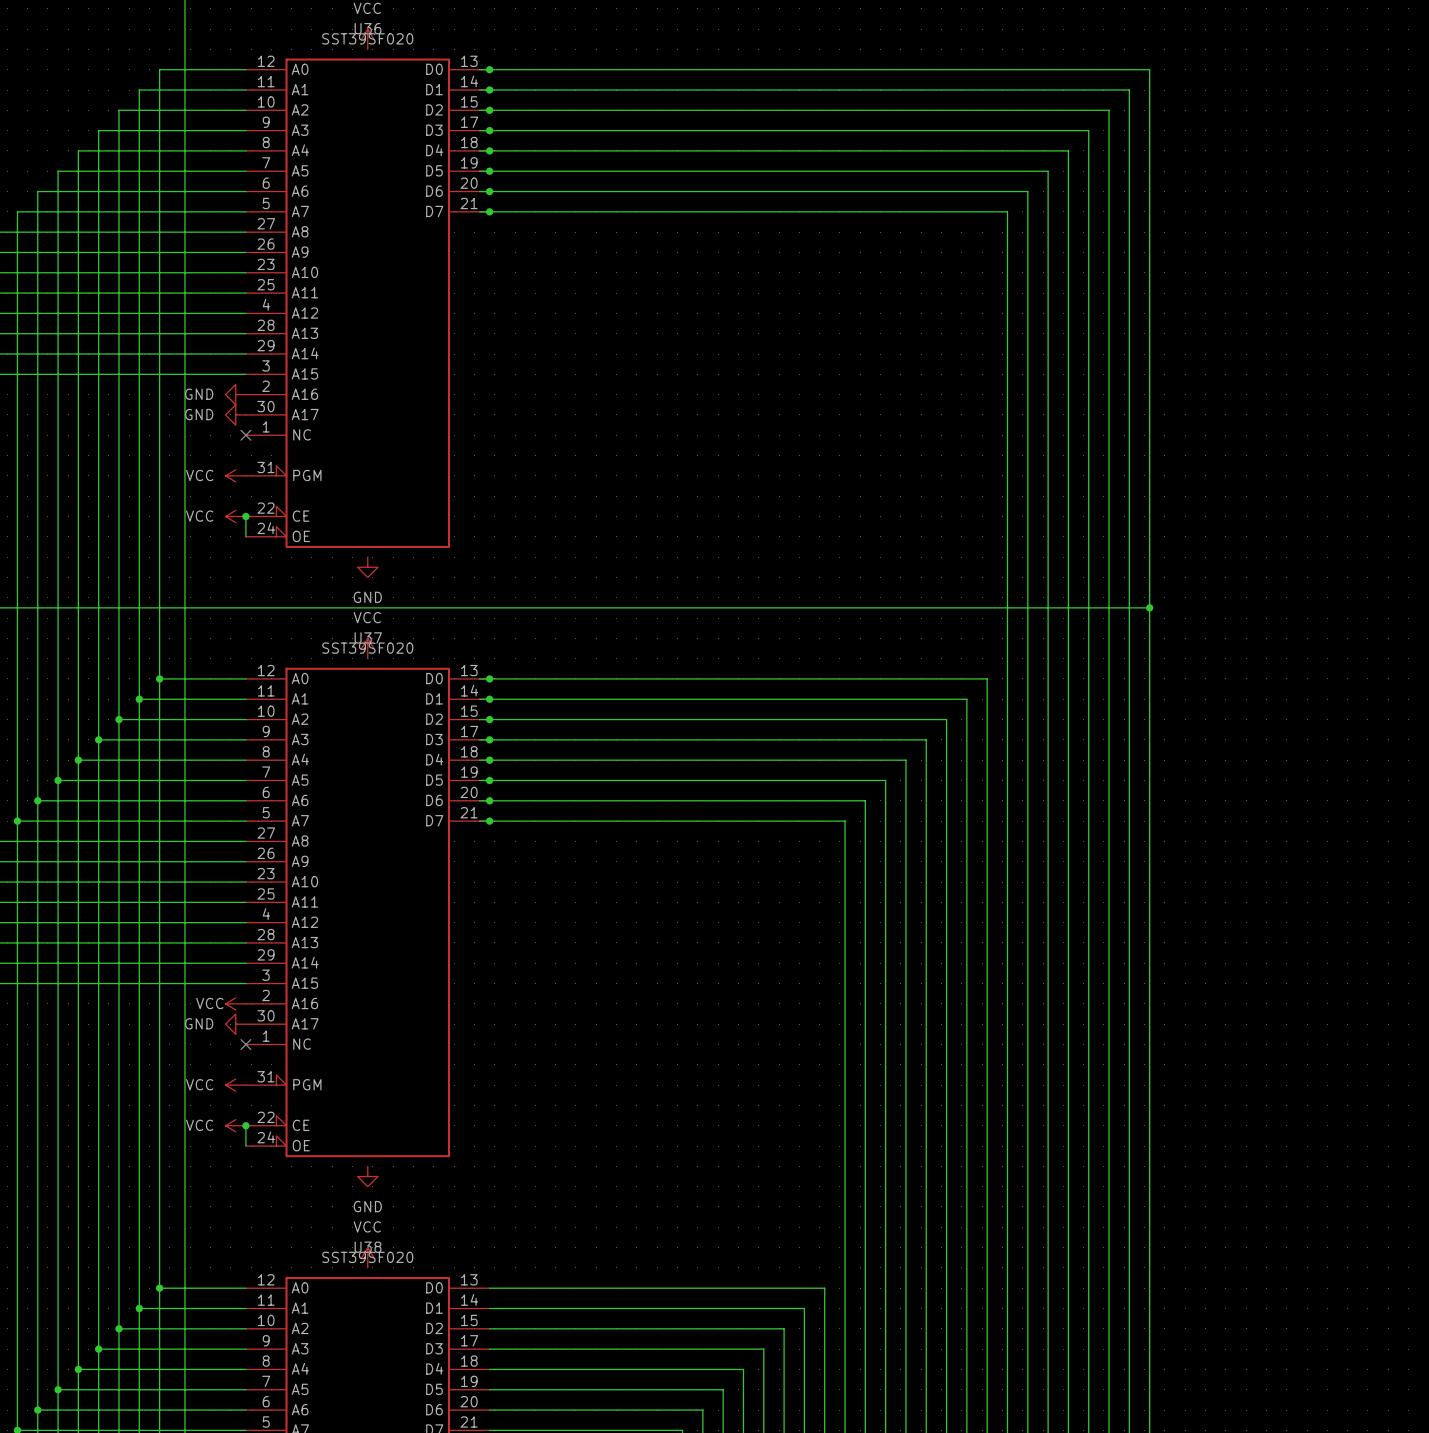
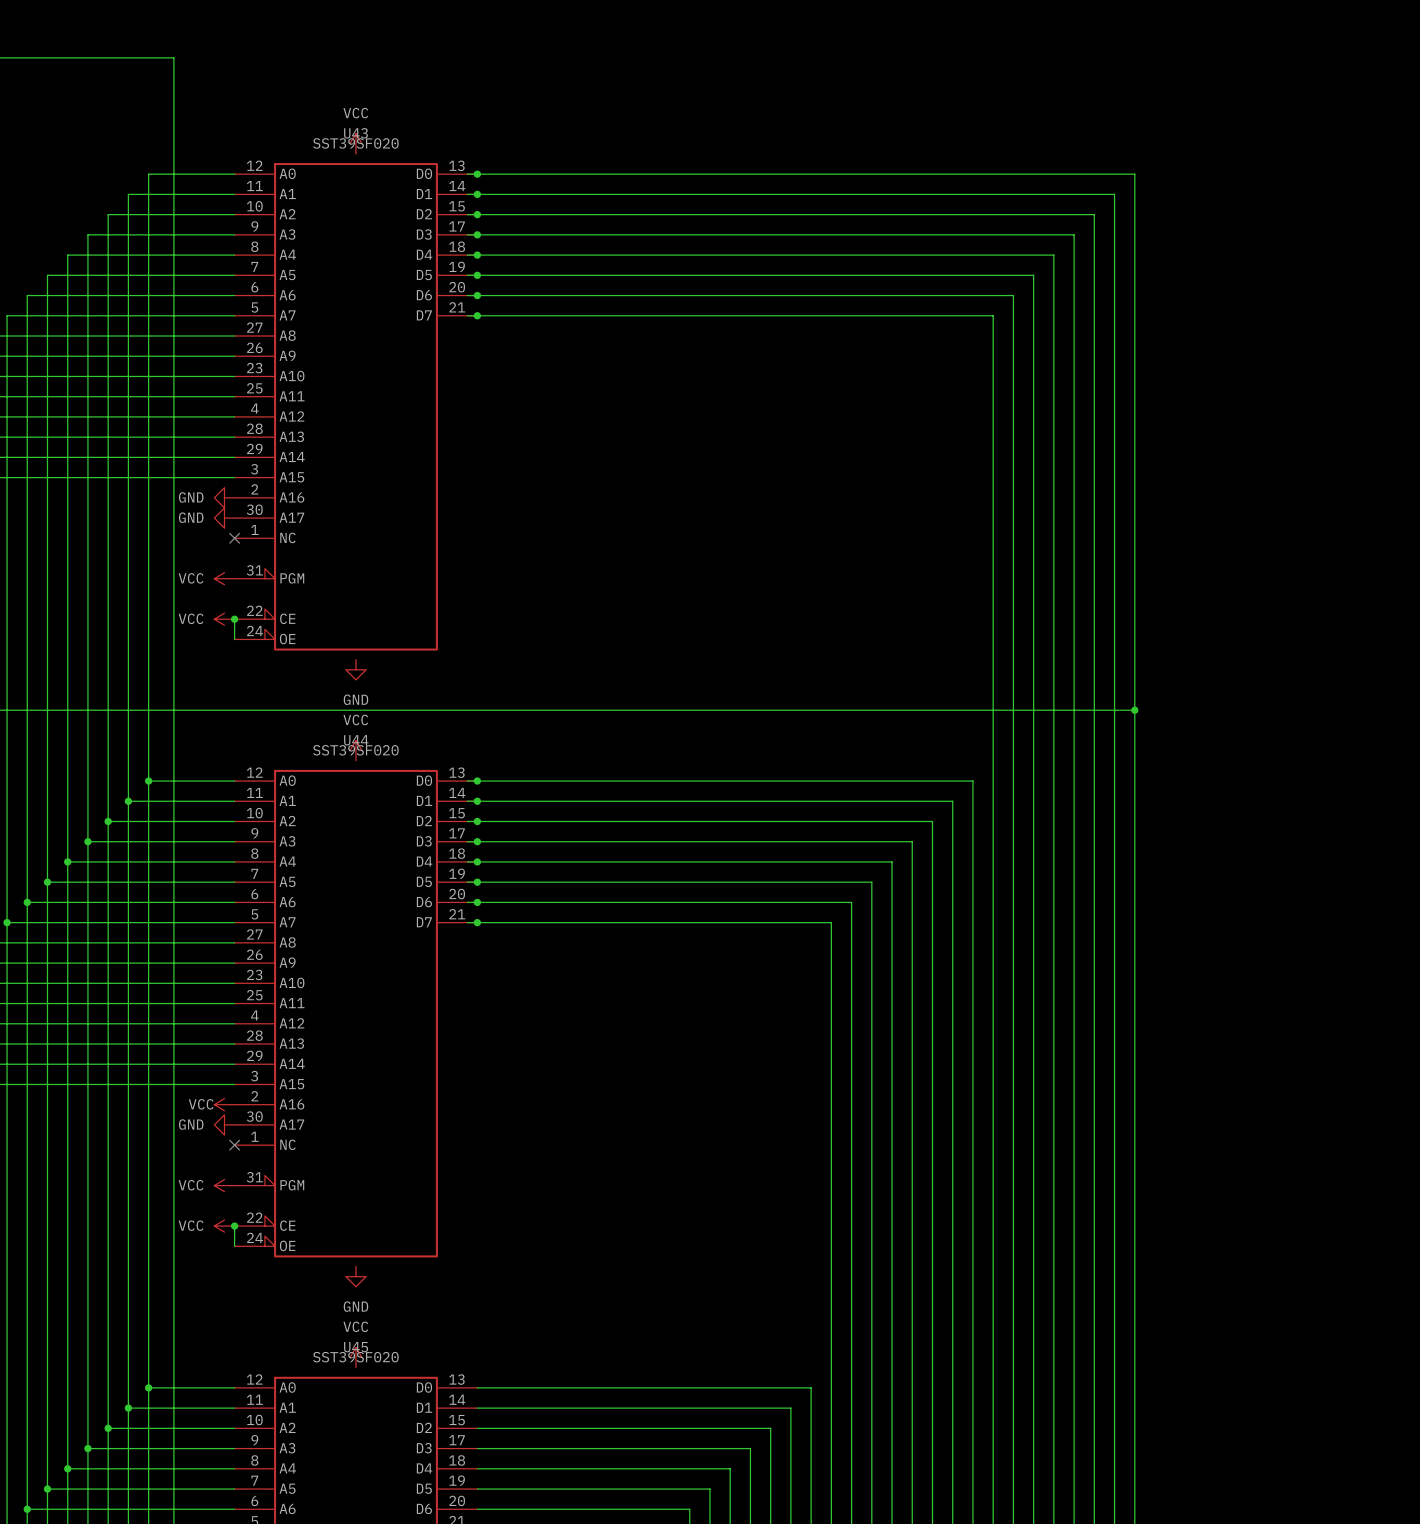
U36 name: U36 (368, 28) -> U43 (355, 133)
U37 name: U37 (368, 637) -> U44 (356, 740)
U38 name: U38 (368, 1247) -> U45 (356, 1347)

